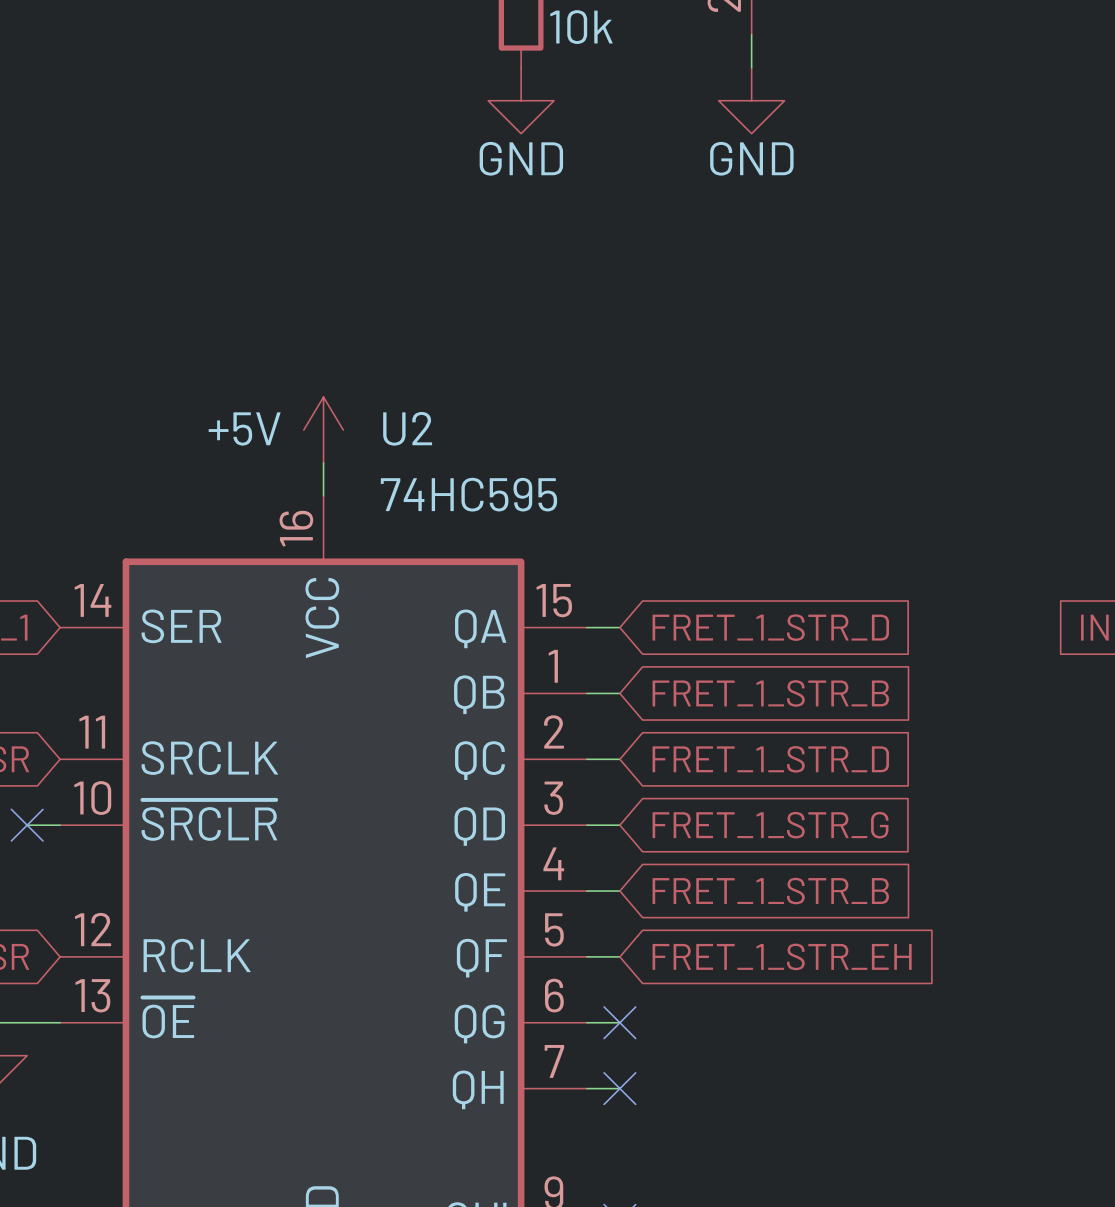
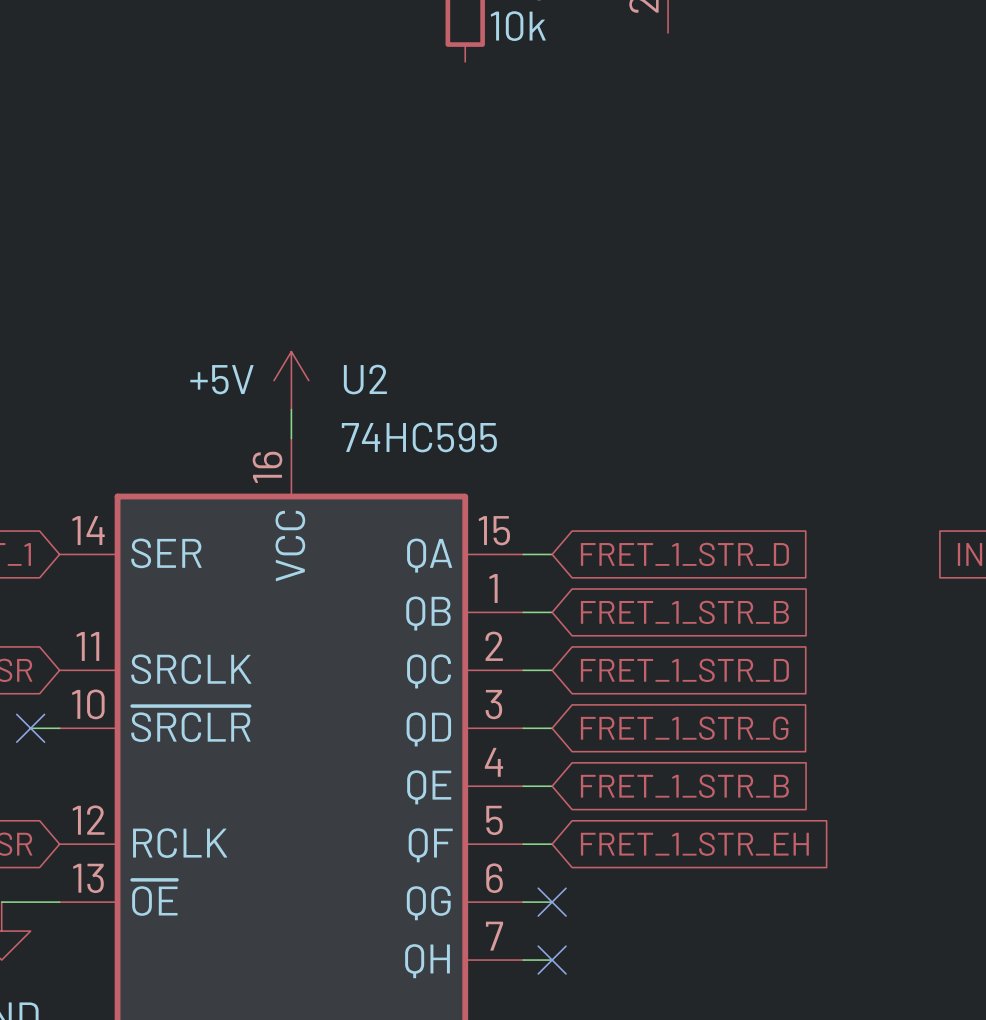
wire: (751, 34) (751, 67) -> none
power symbol: GND (521, 100) -> none
power symbol: GND (751, 100) -> none

